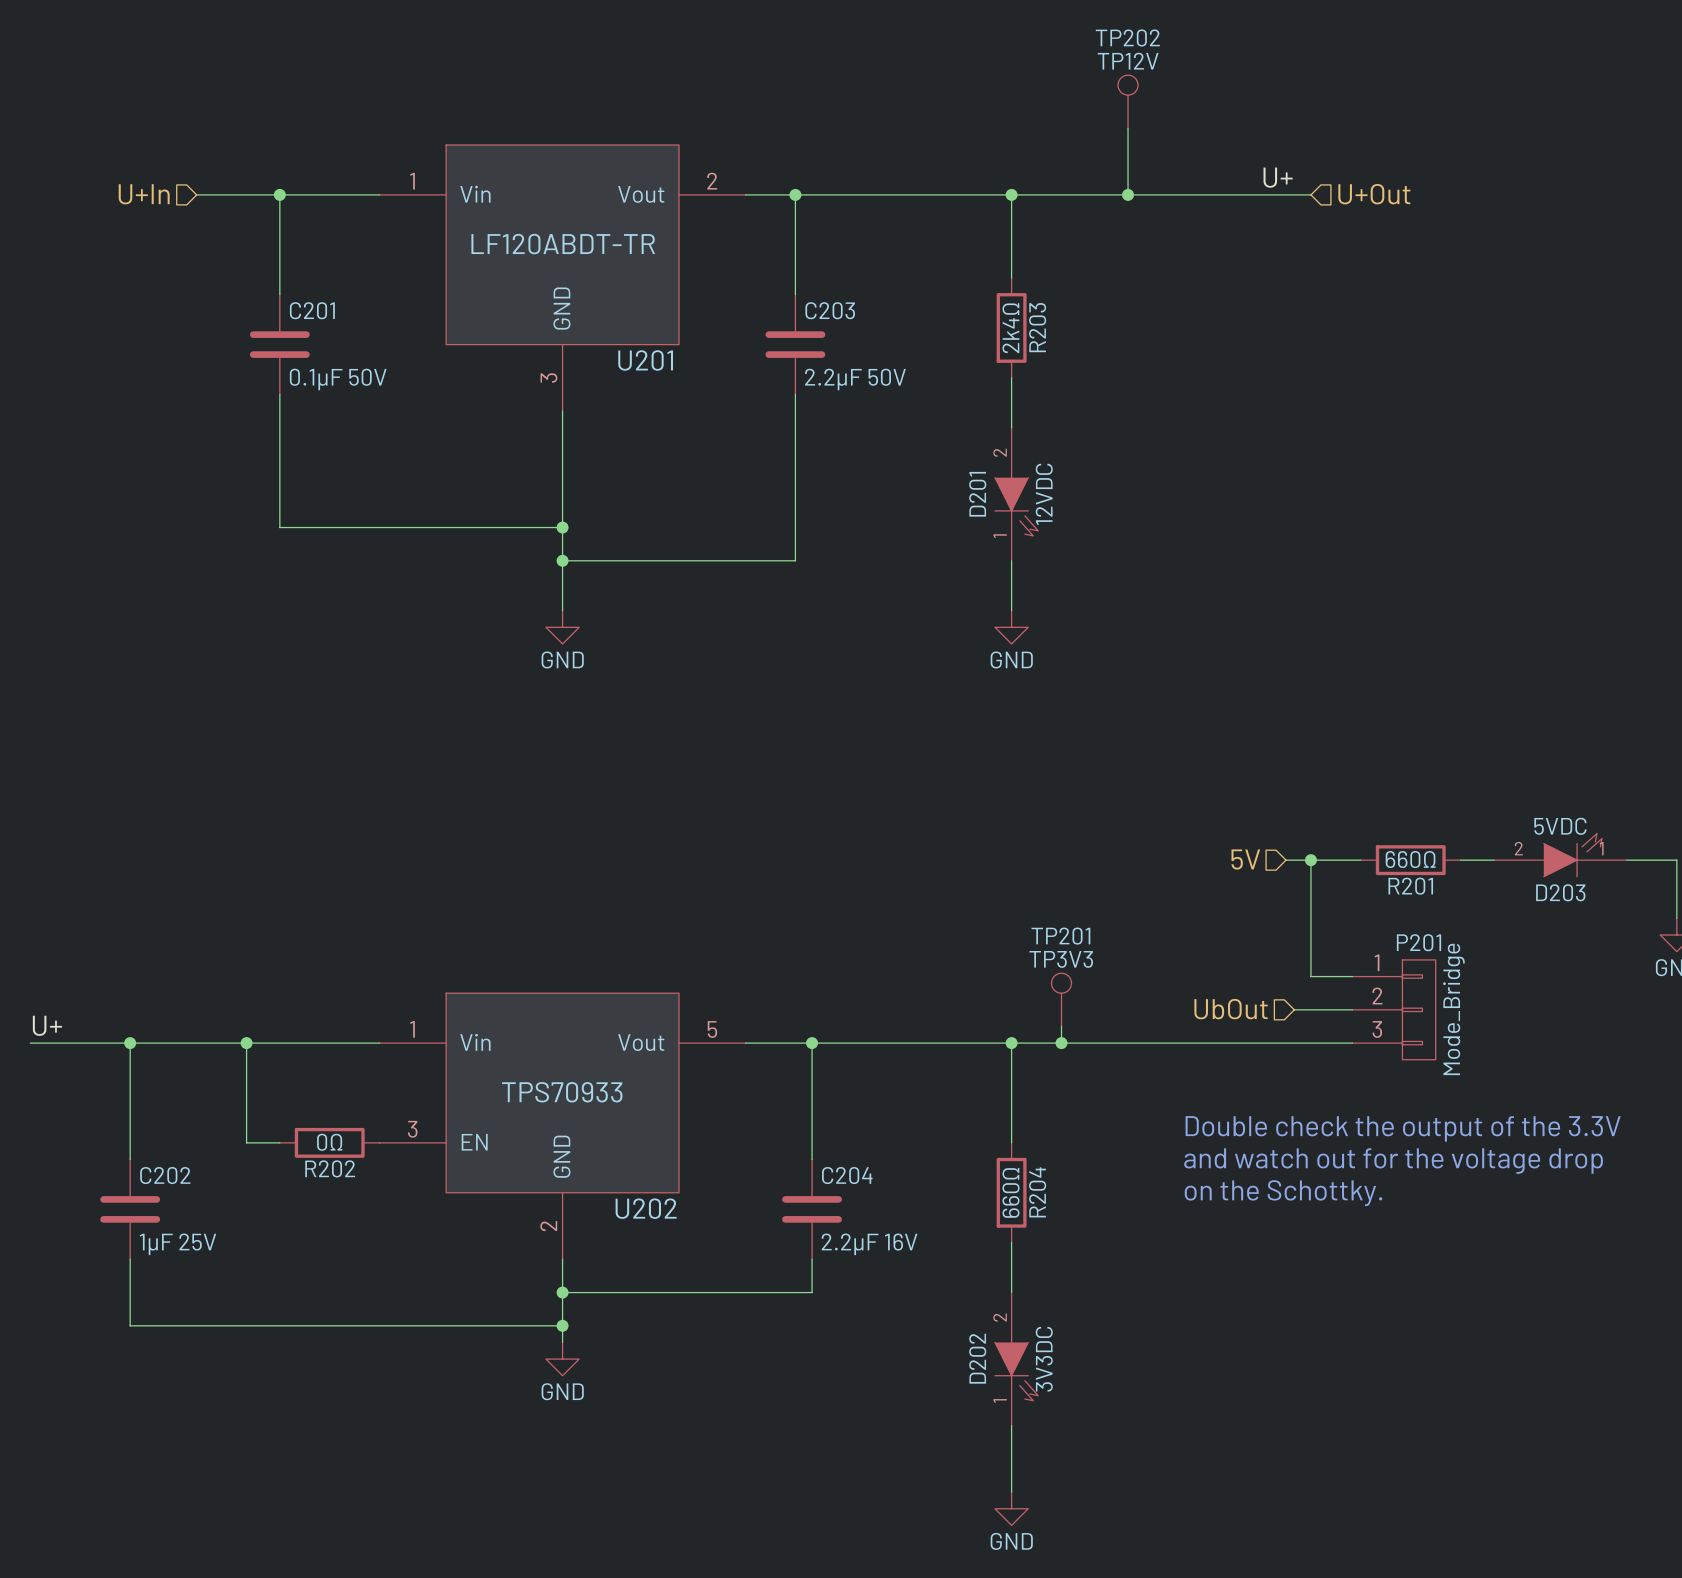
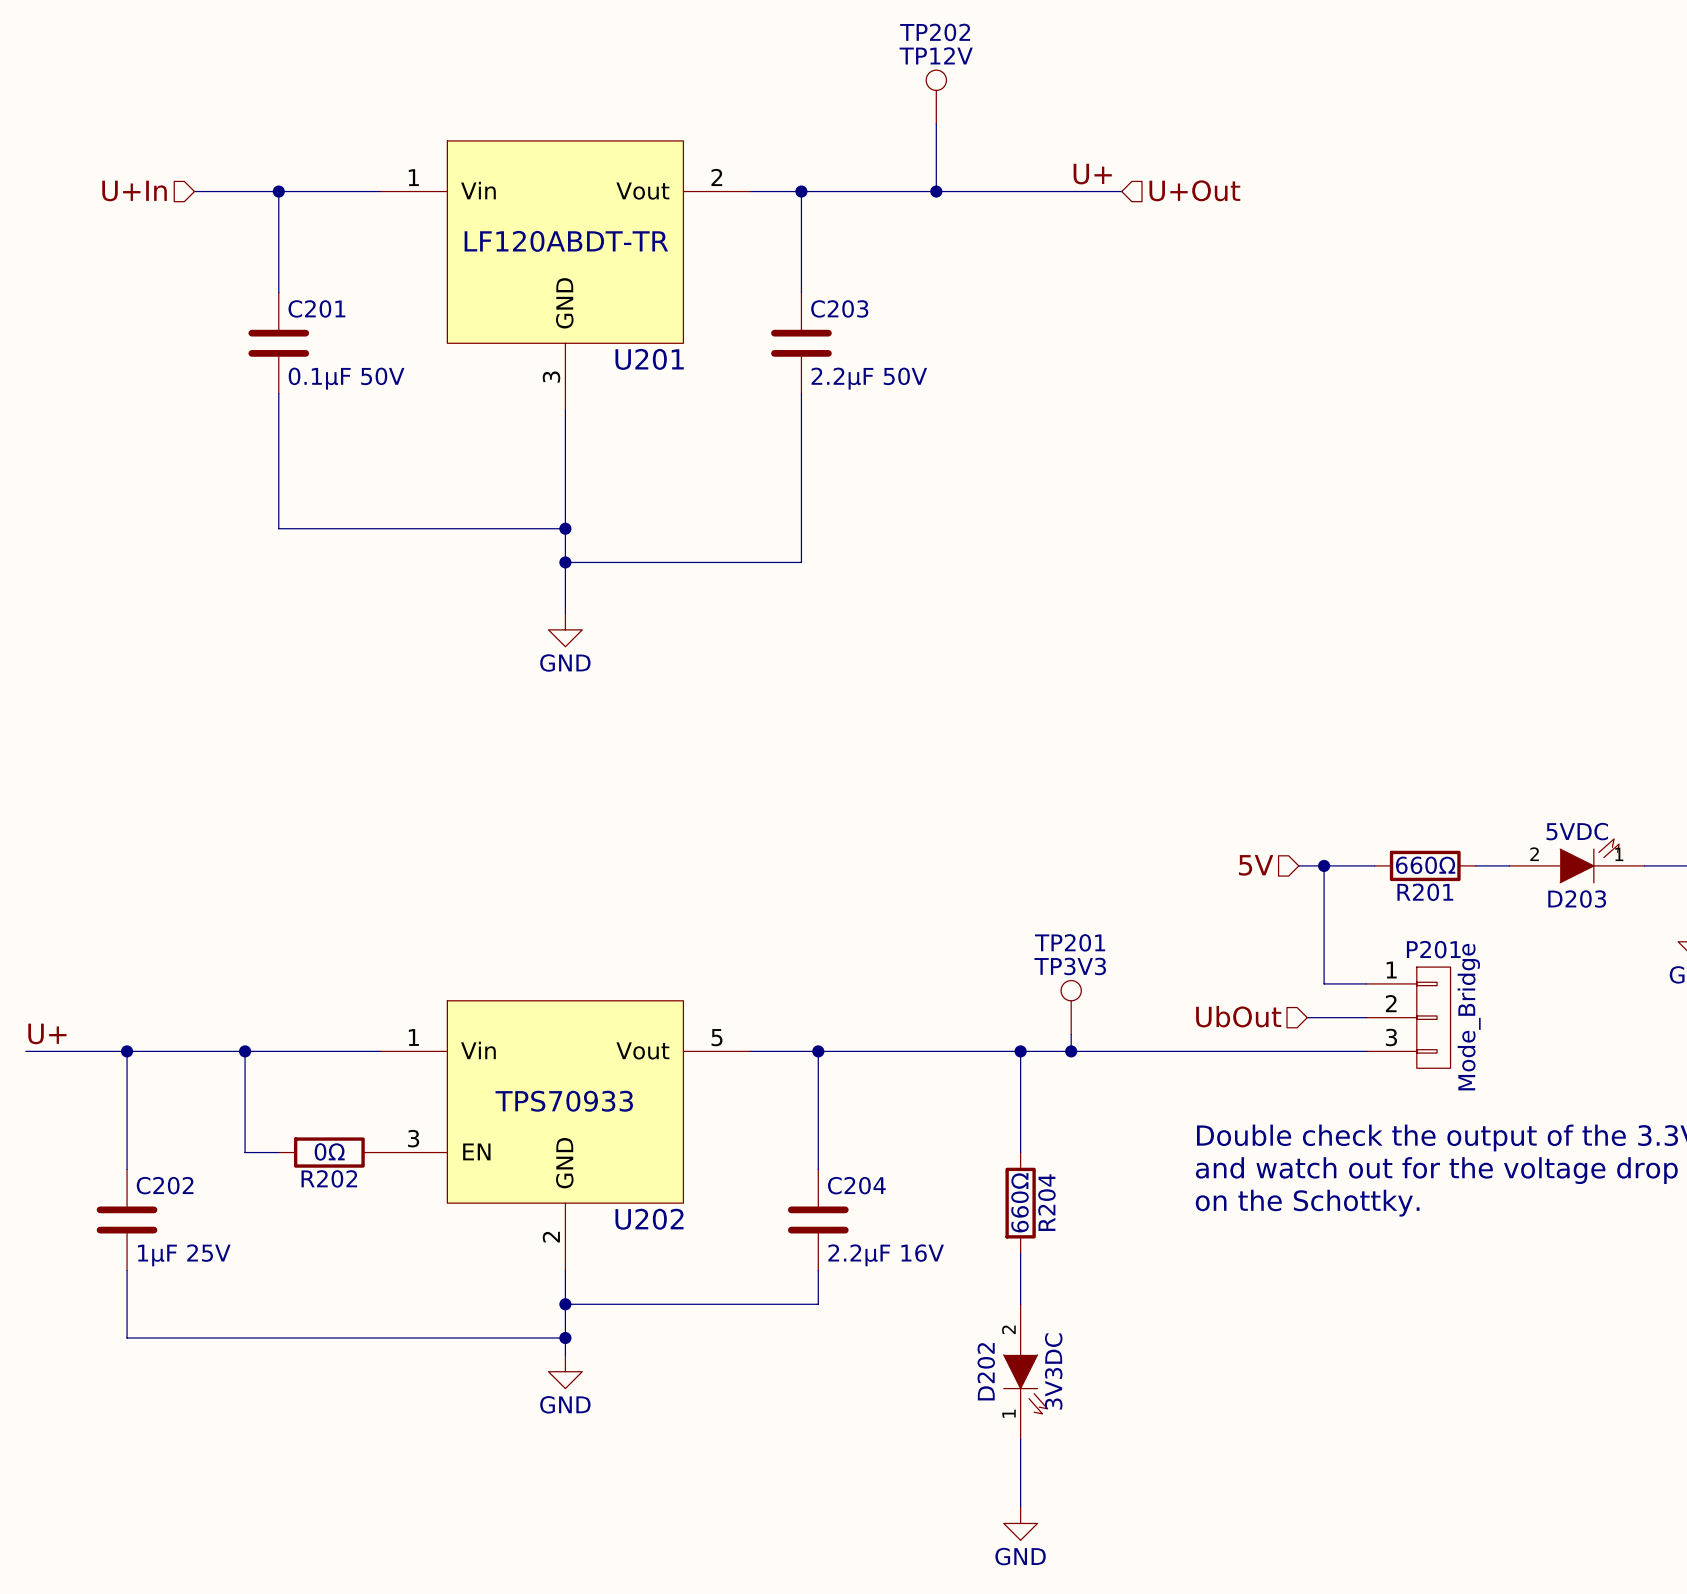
TP202 position: (1128, 101) -> (936, 97)
wire: (1128, 128) (1128, 194) -> (936, 124) (936, 191)
label position: U+ (1278, 177) -> U+ (1092, 174)
junction: none -> (936, 191)
wire: (1011, 194) (1011, 278) -> none
junction: (1011, 194) -> none
wire: (1111, 194) (1310, 194) -> none
junction: (1128, 194) -> none
hierarchical label position: U+Out (1374, 194) -> U+Out (1194, 190)
R203: 2k4Ω (1011, 327) -> none
wire: (1011, 377) (1011, 427) -> none
D201: 12VDC (1016, 494) -> none
wire: (1011, 560) (1011, 610) -> none
power symbol: GND (1011, 627) -> none

